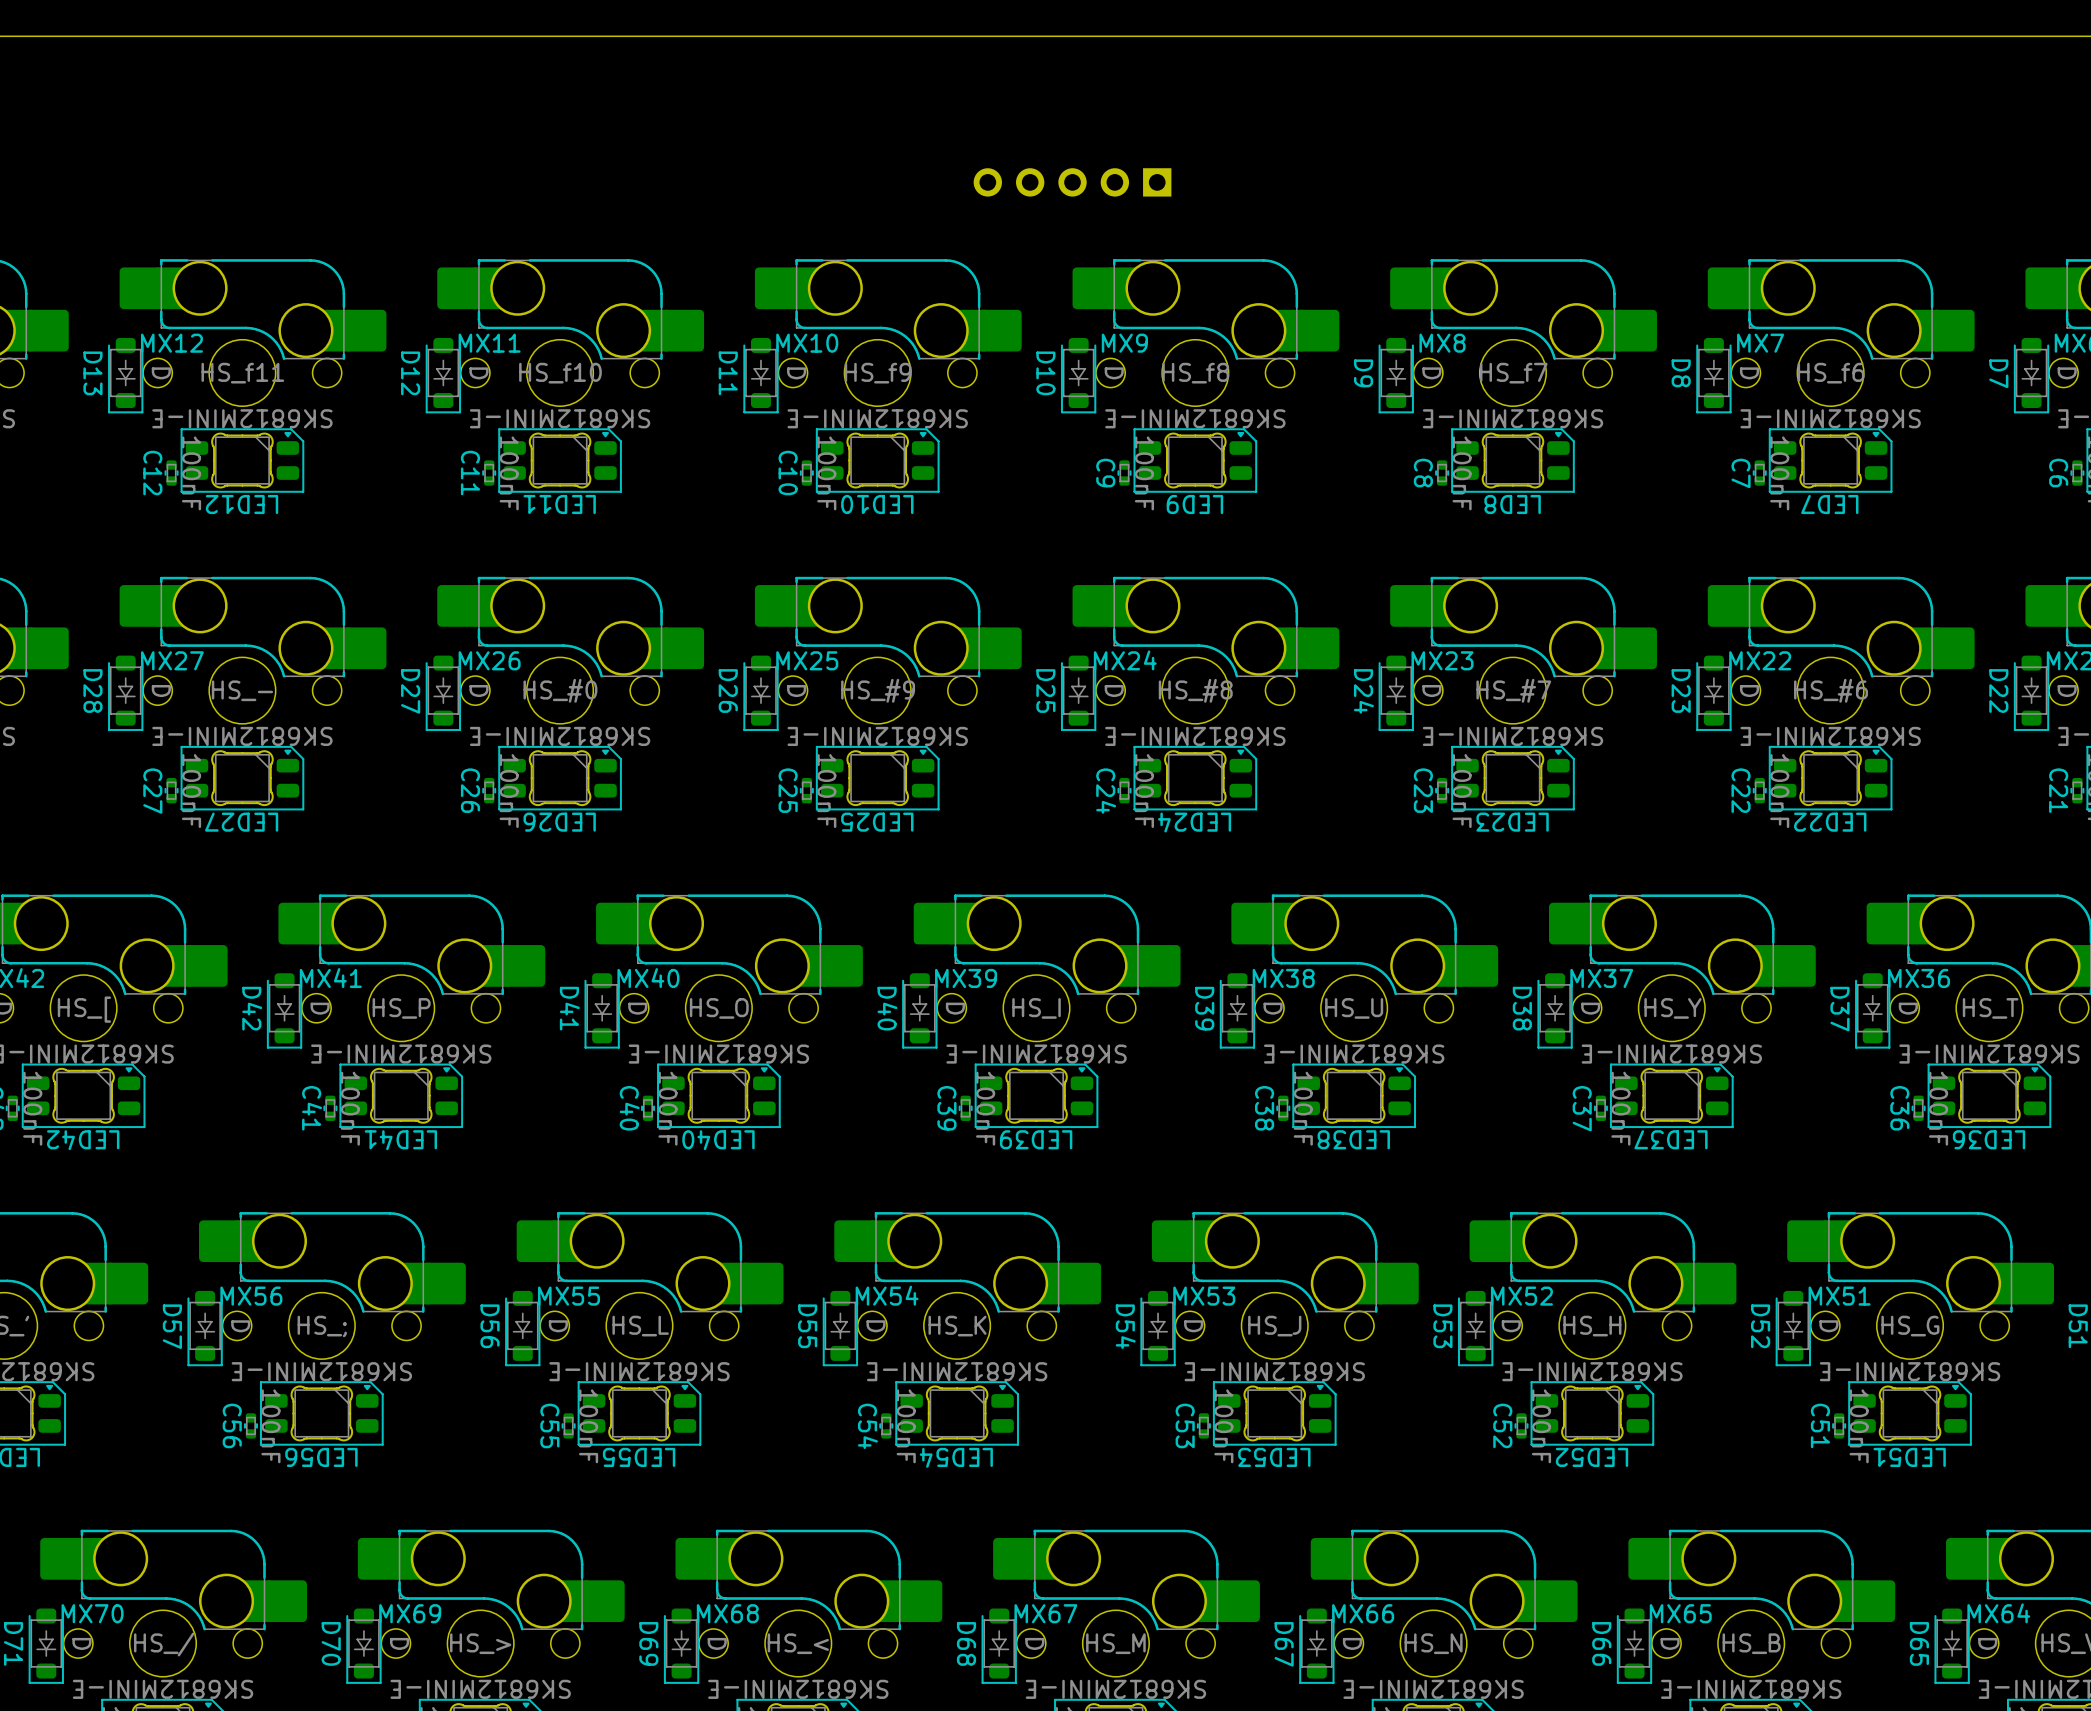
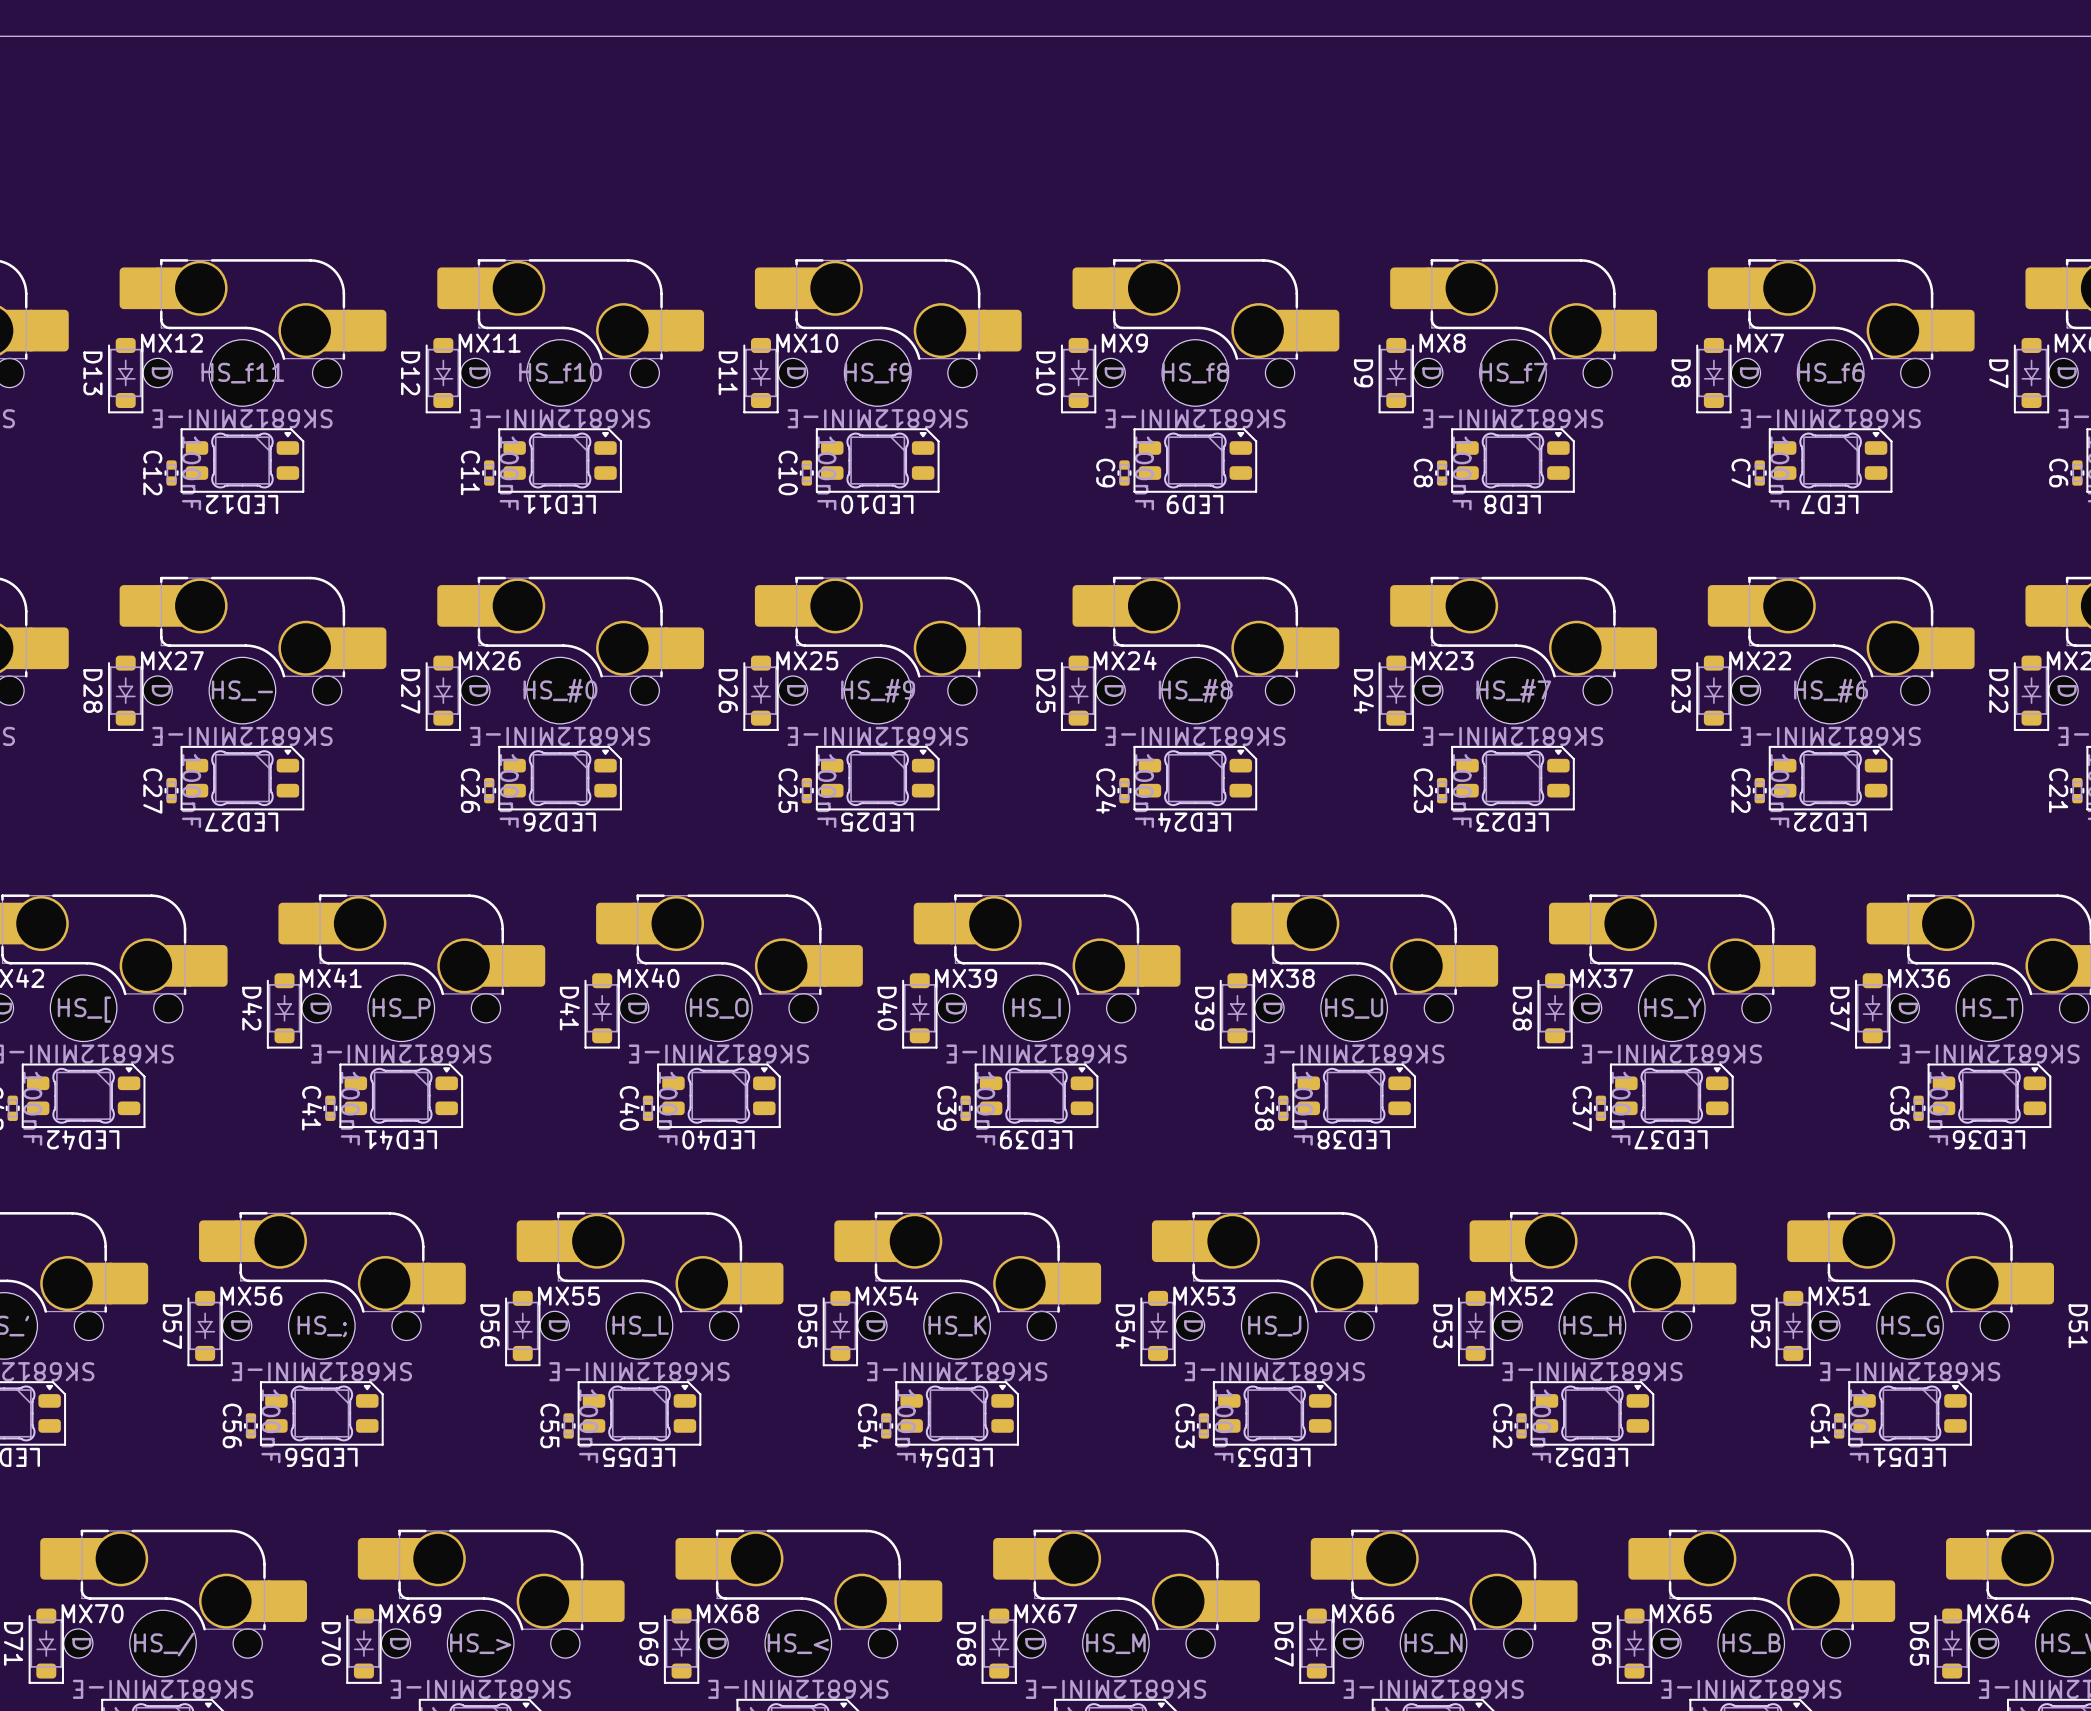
part: (1072, 182) -> none

